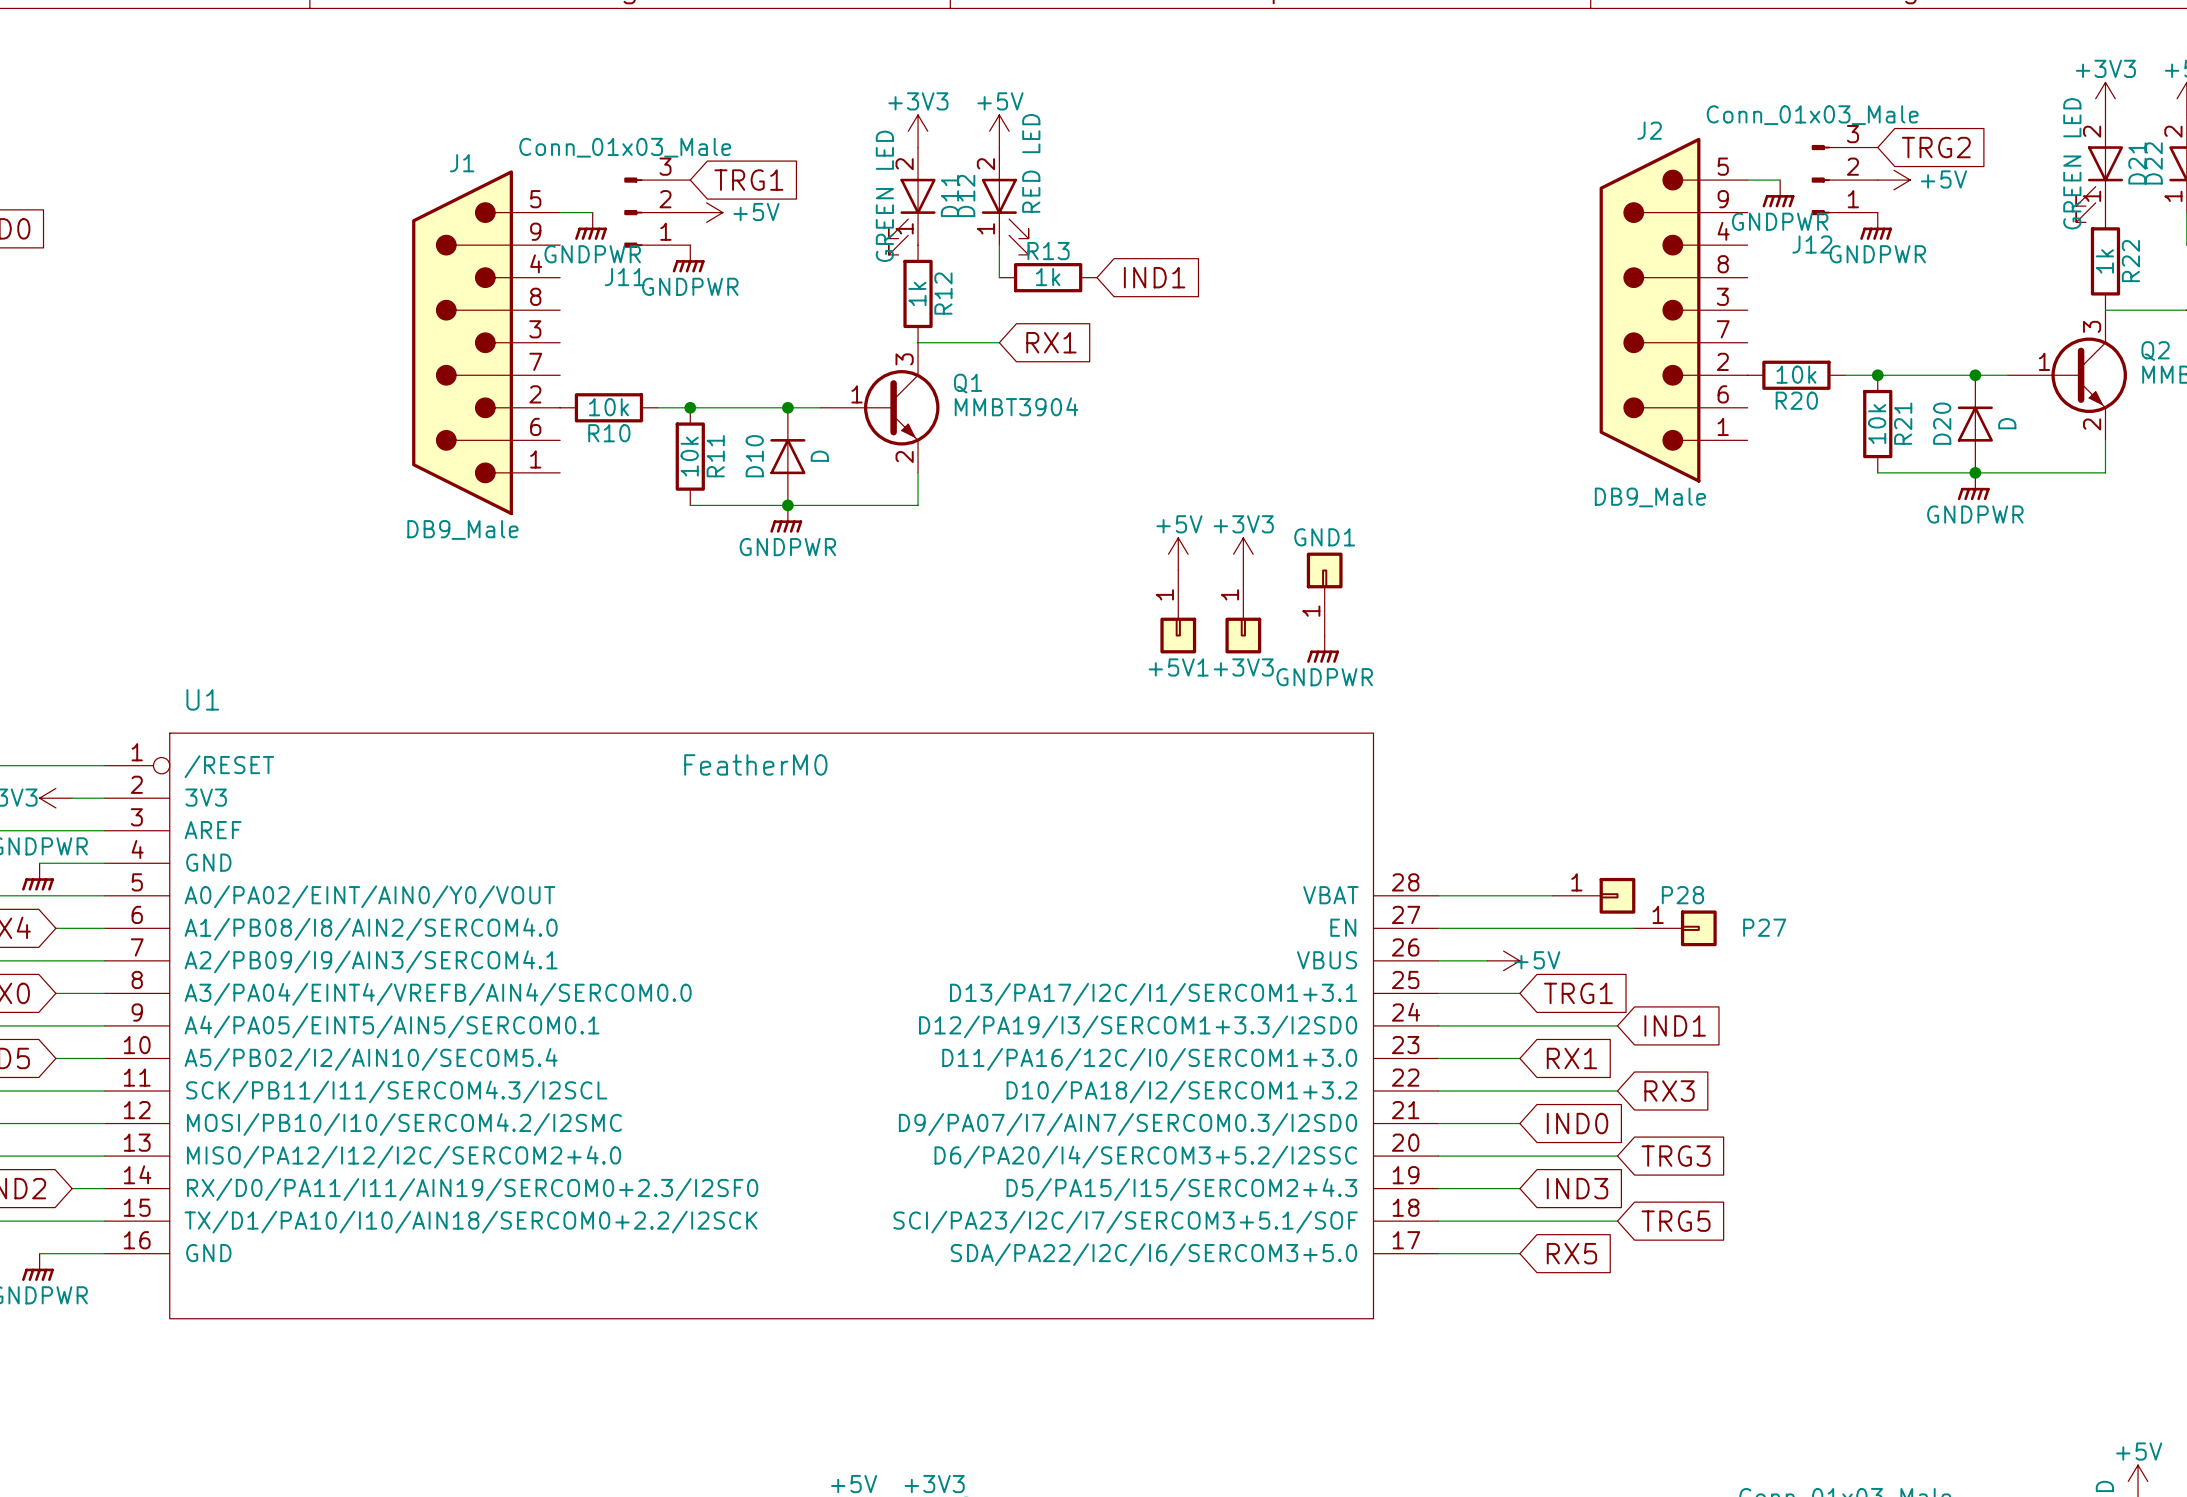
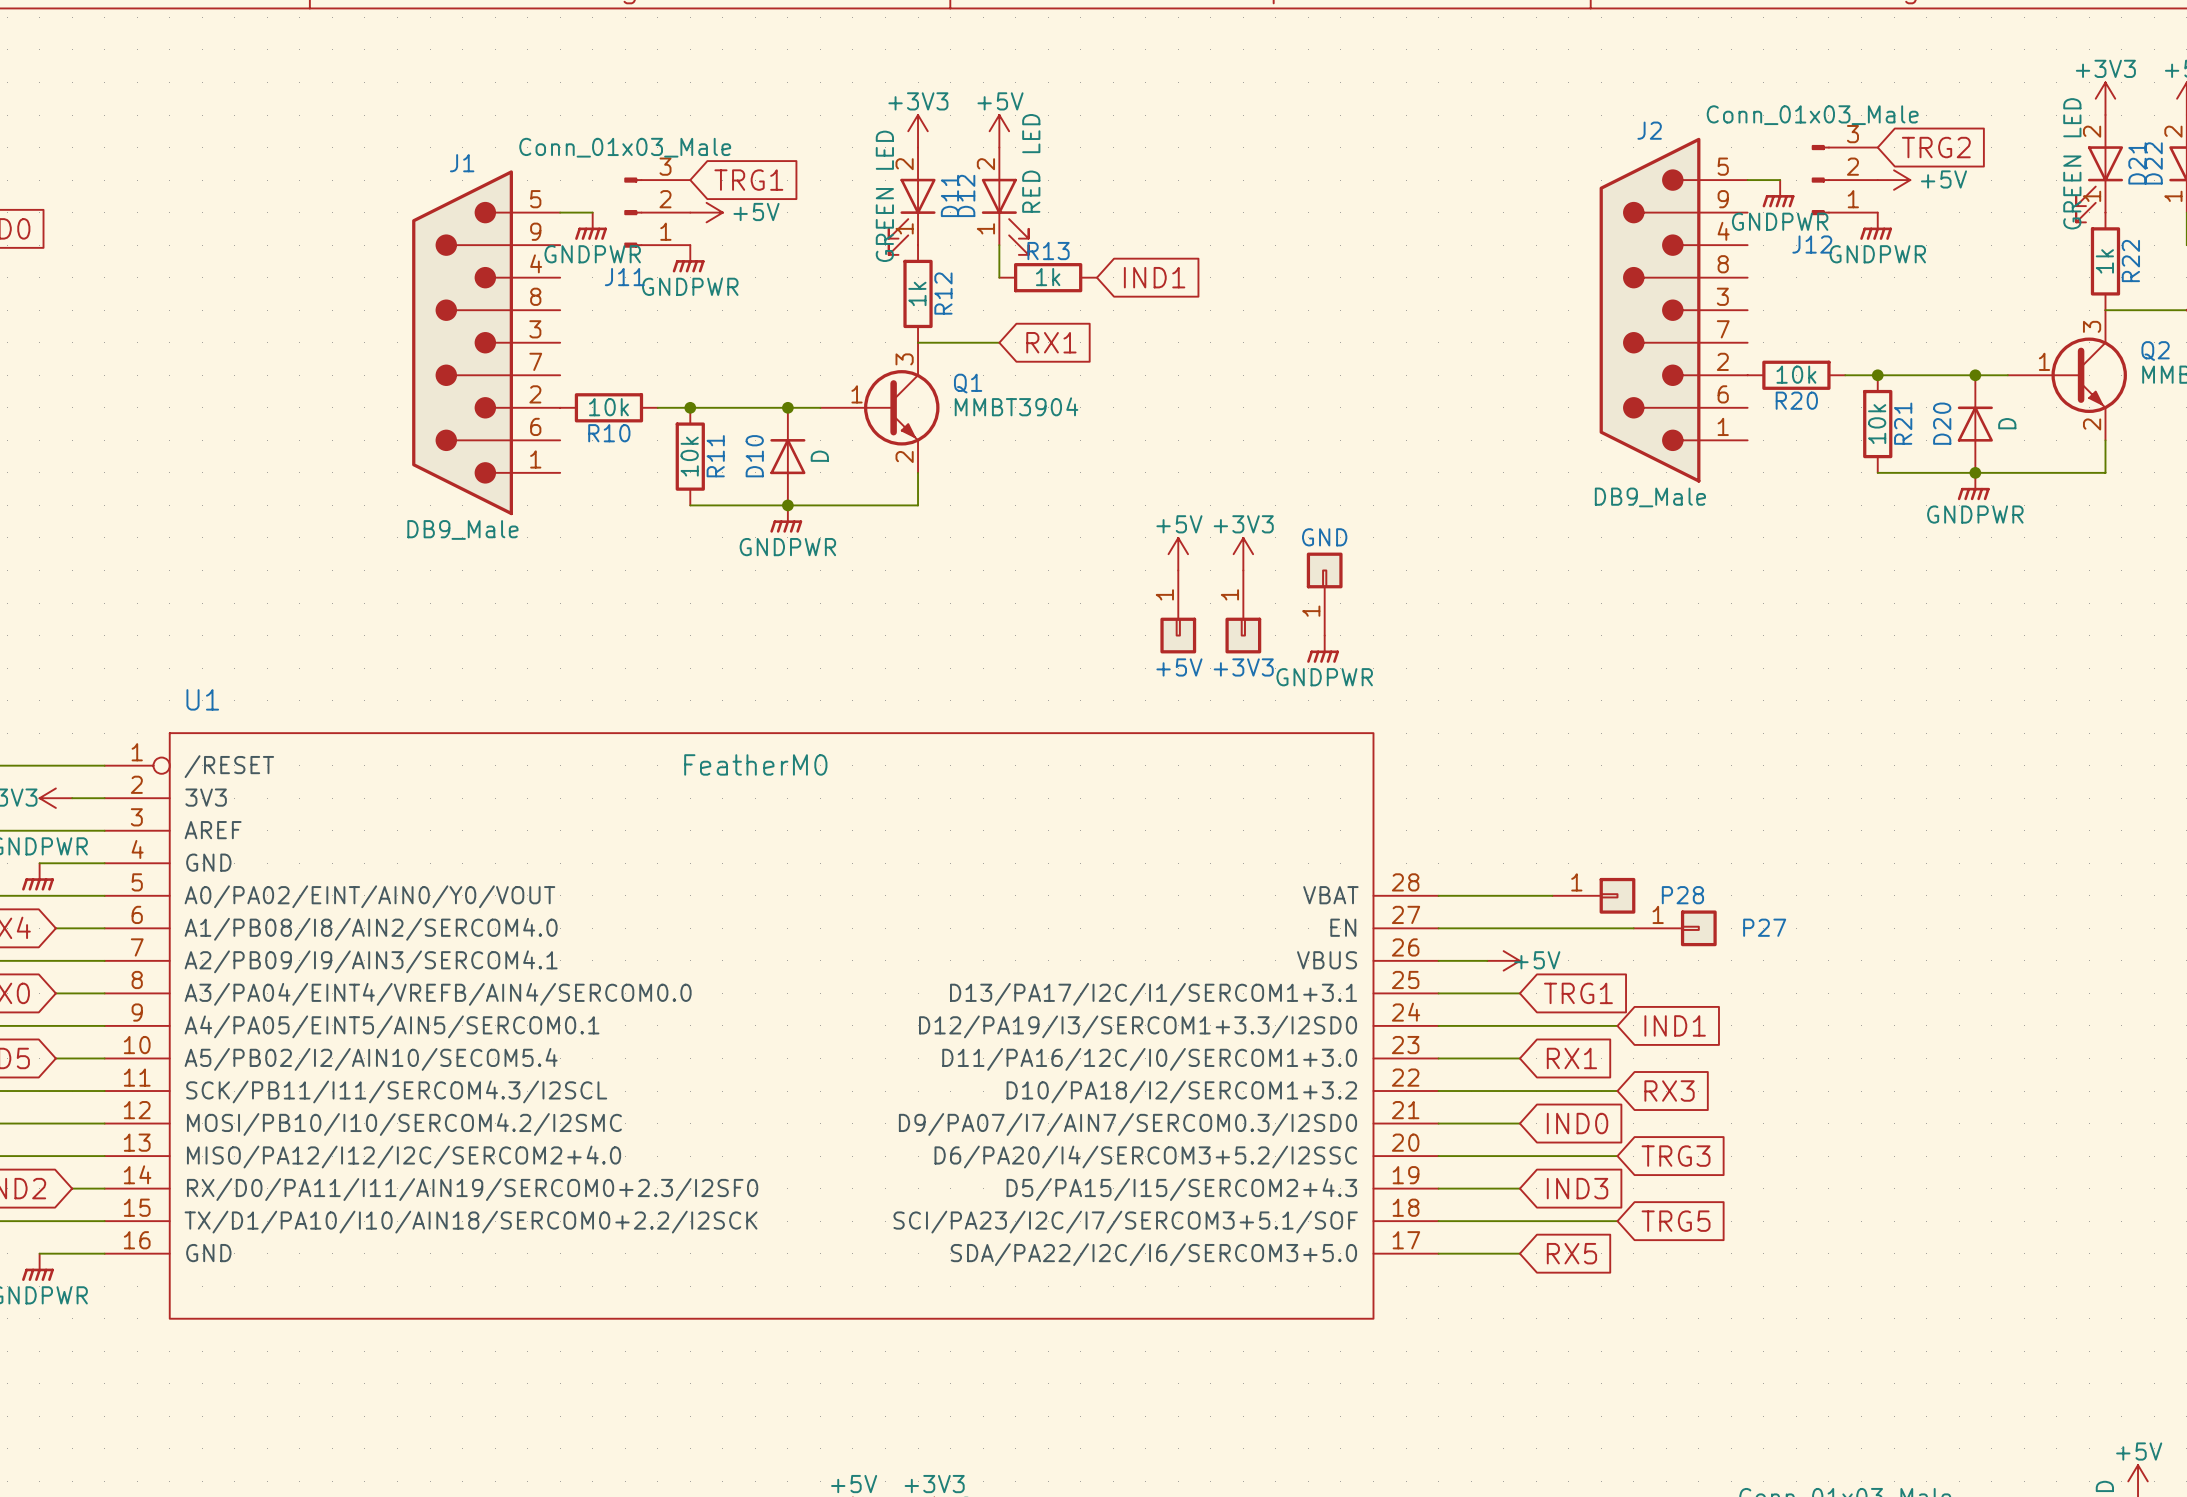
GND1 name: GND1 (1324, 537) -> GND (1324, 537)
+5V1 name: +5V1 (1178, 667) -> +5V (1179, 667)

